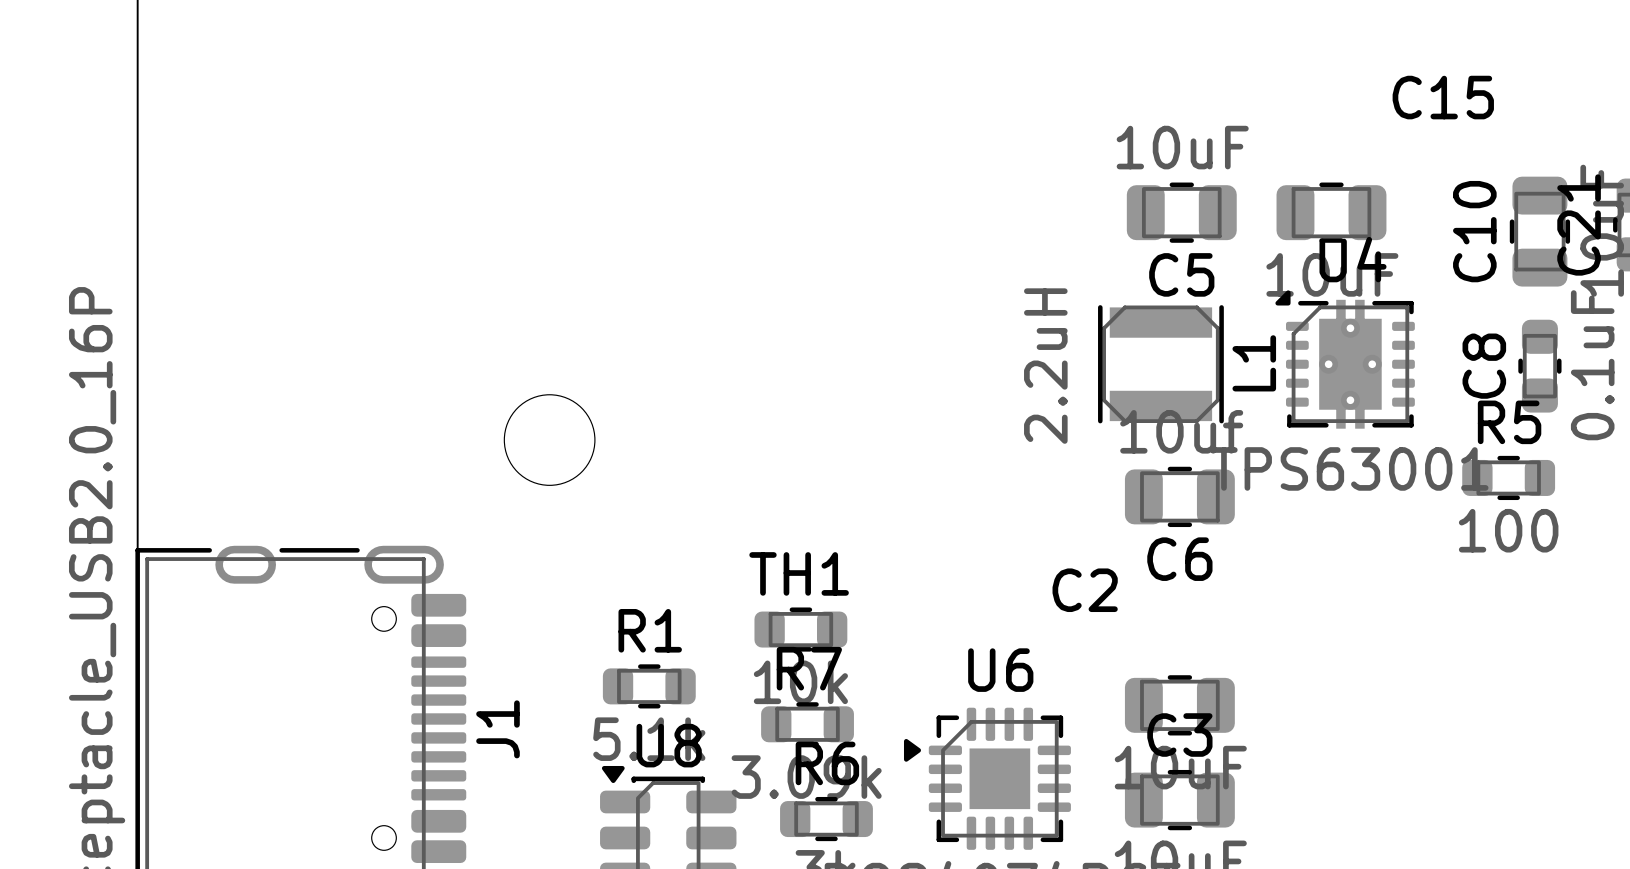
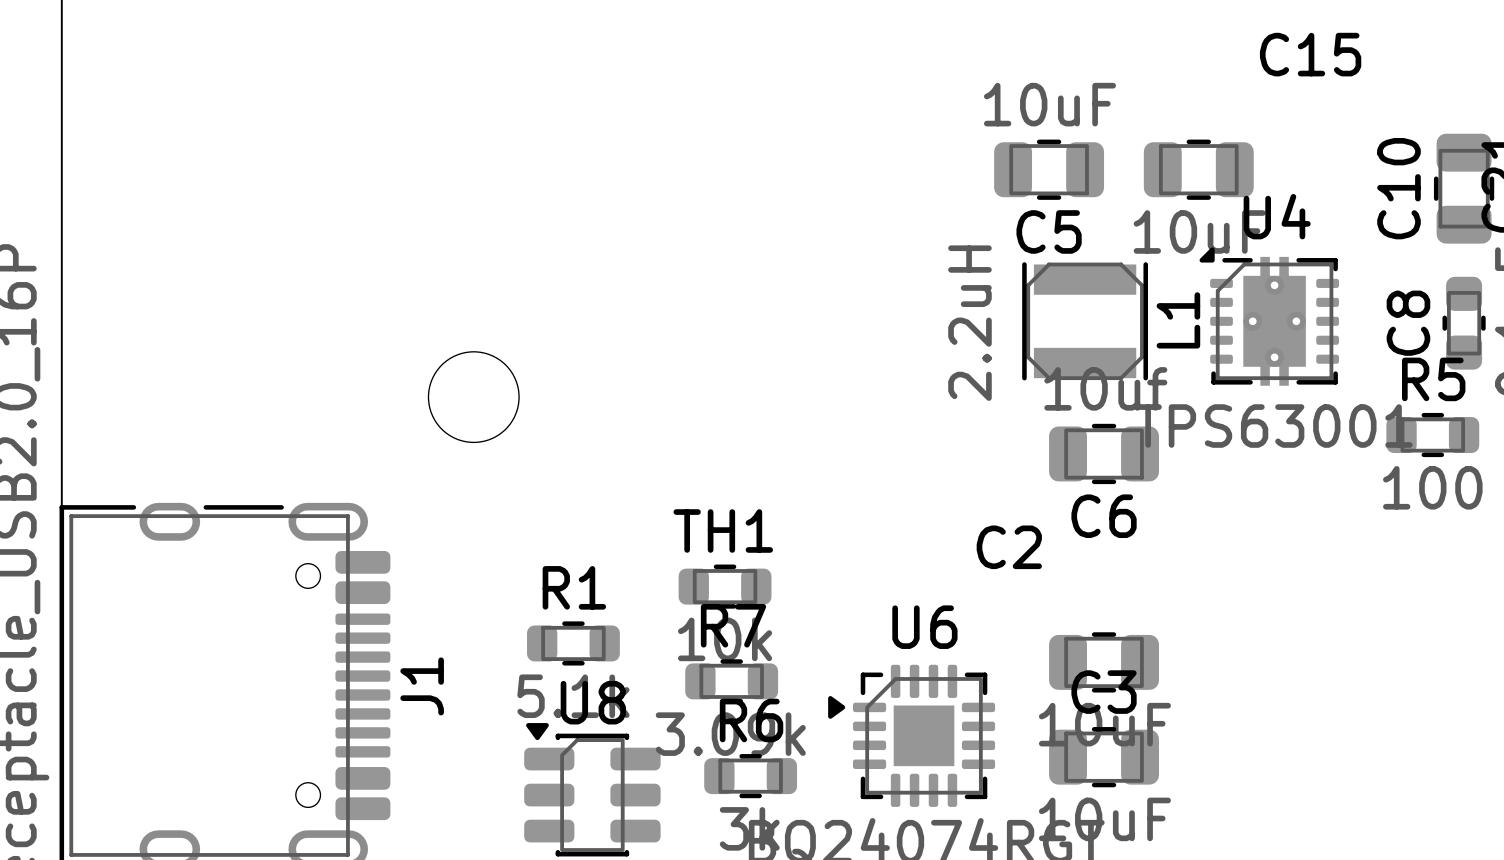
C5 position: (1181, 212) -> (1049, 169)
C15 position: (1331, 212) -> (1198, 169)

